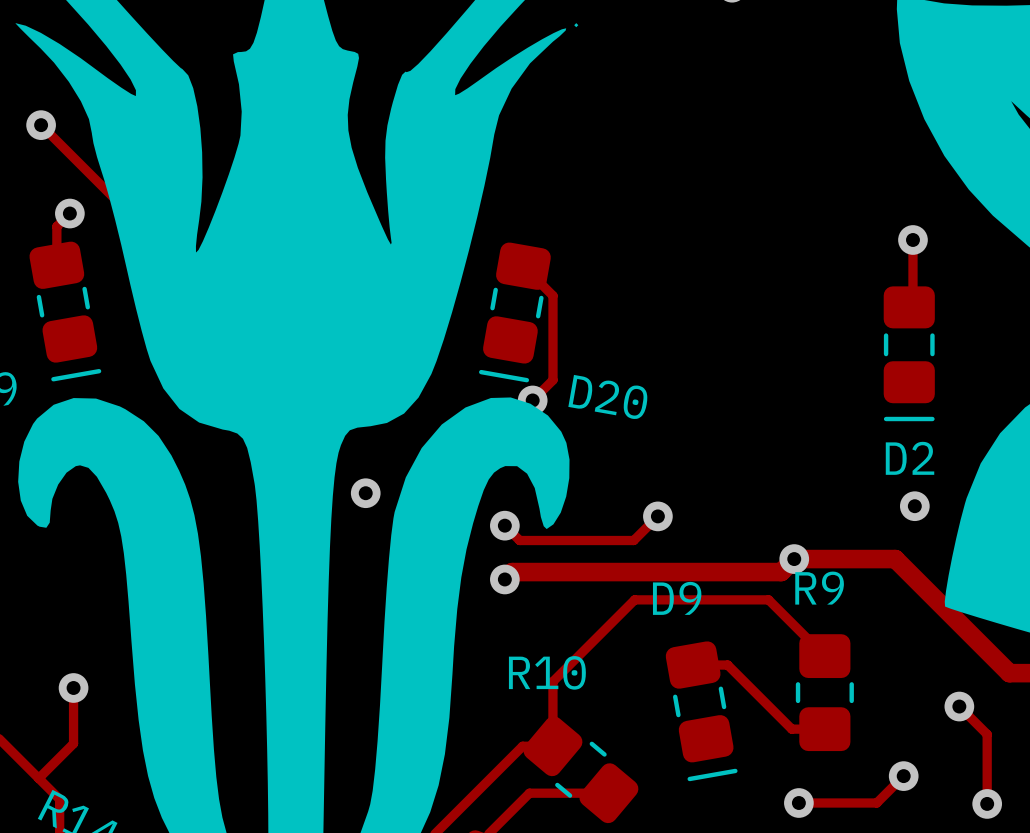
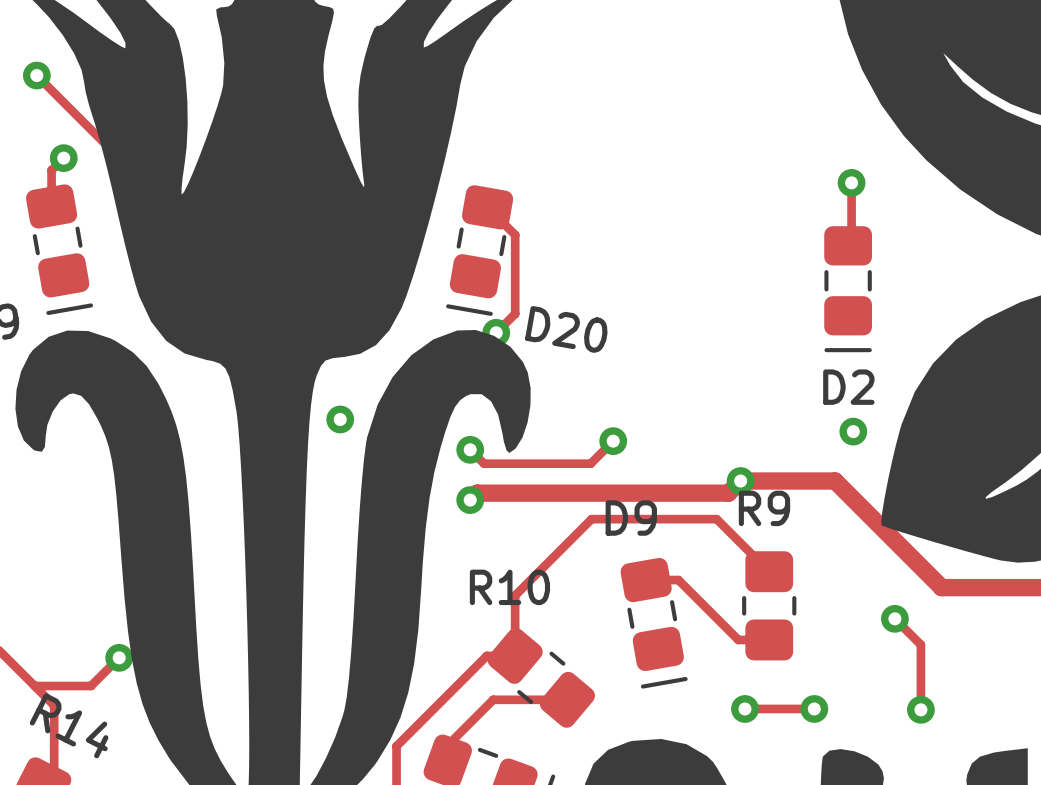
track: (73, 687) (73, 743) (38, 778) -> (119, 657) (91, 686) (34, 686)
via position: (73, 687) -> (119, 657)
track: (903, 776) (876, 803) (873, 803) -> none
via position: (903, 776) -> (814, 708)

